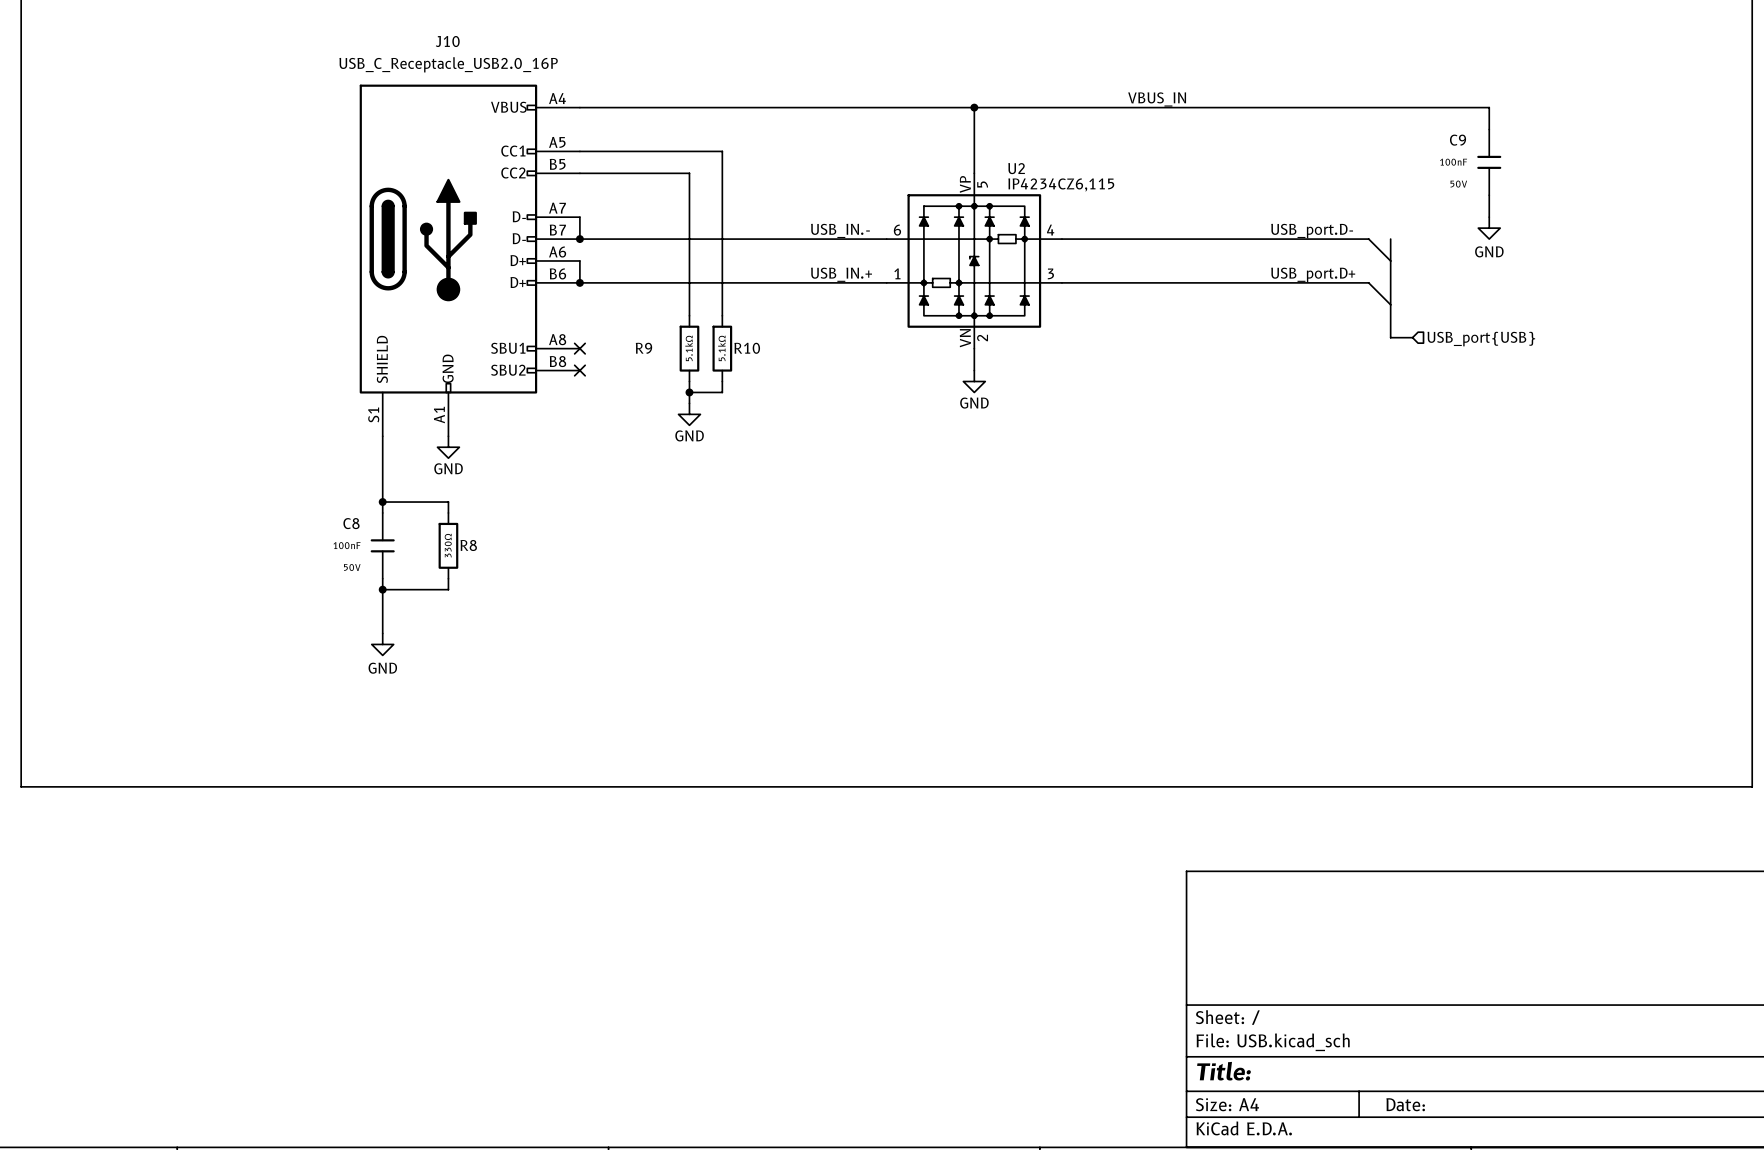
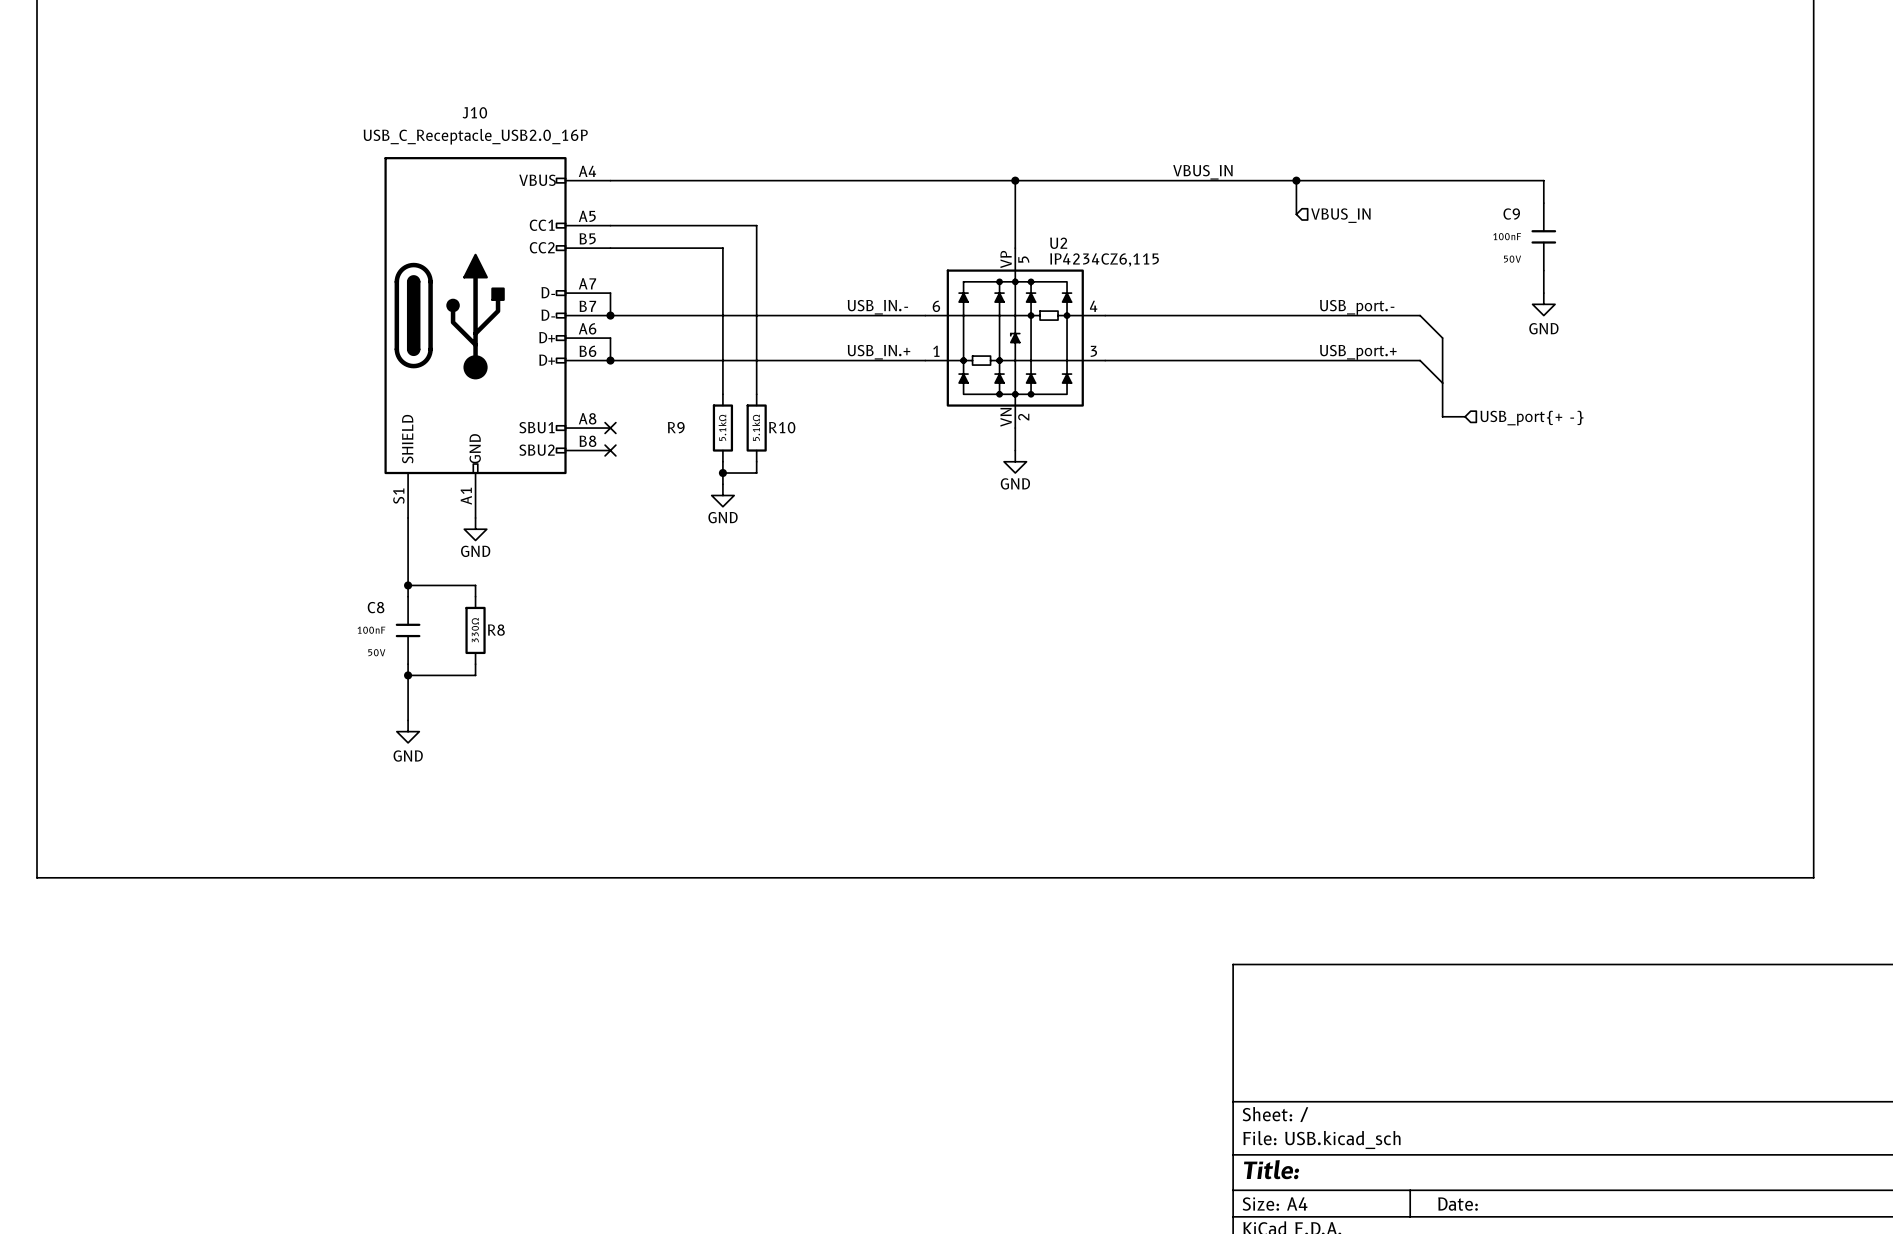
wire: none -> (1296, 180) (1296, 214)
junction: none -> (1296, 180)
hierarchical label: none -> VBUS_IN (1340, 215)
label: USB_port.D- (1312, 231) -> USB_port.- (1357, 307)
bus: (1390, 239) (1390, 260) -> none
label: USB_port.D+ (1313, 274) -> USB_port.+ (1358, 352)
hierarchical label: USB_port{USB} (1481, 339) -> USB_port{+ -} (1531, 418)

